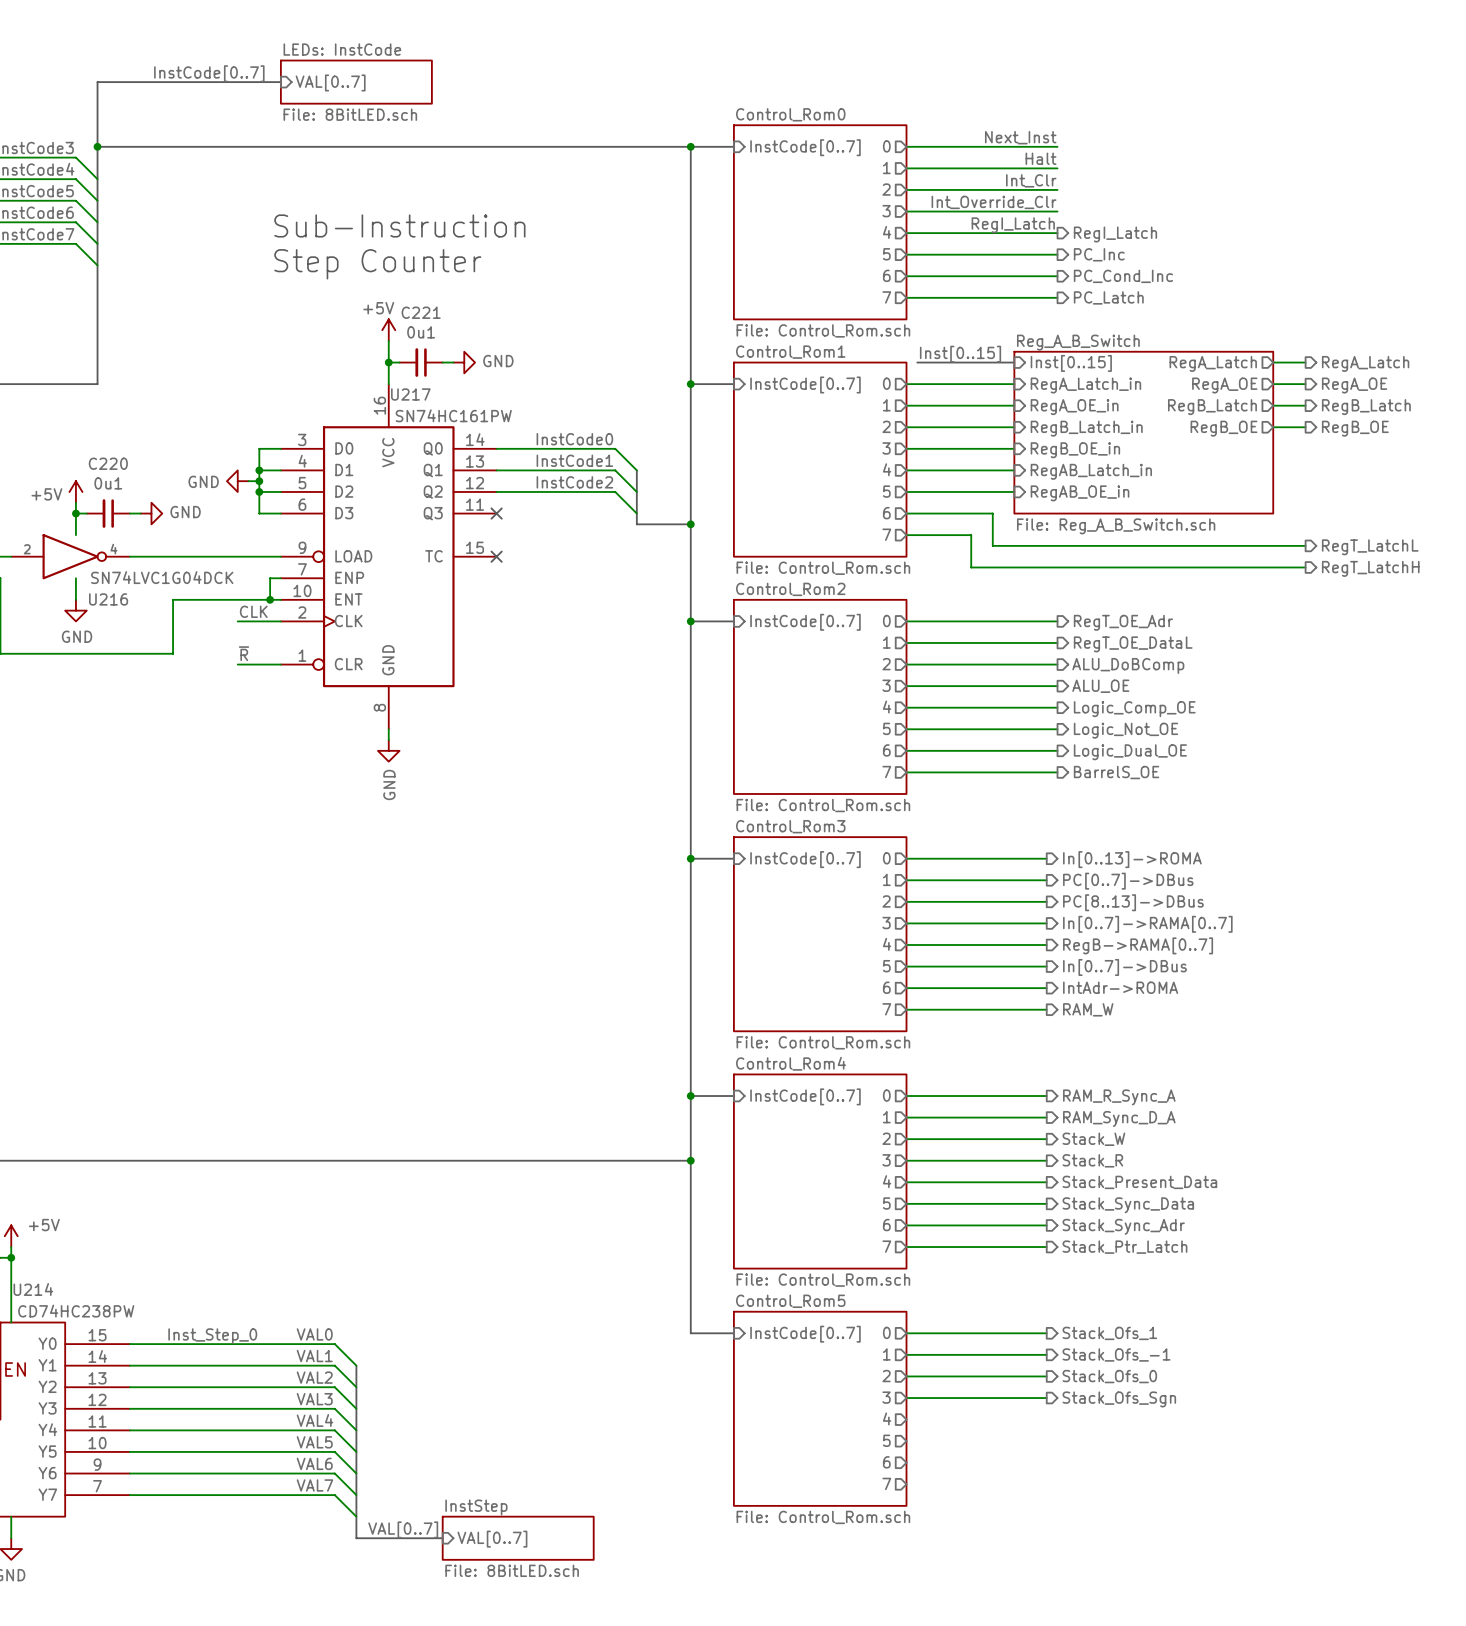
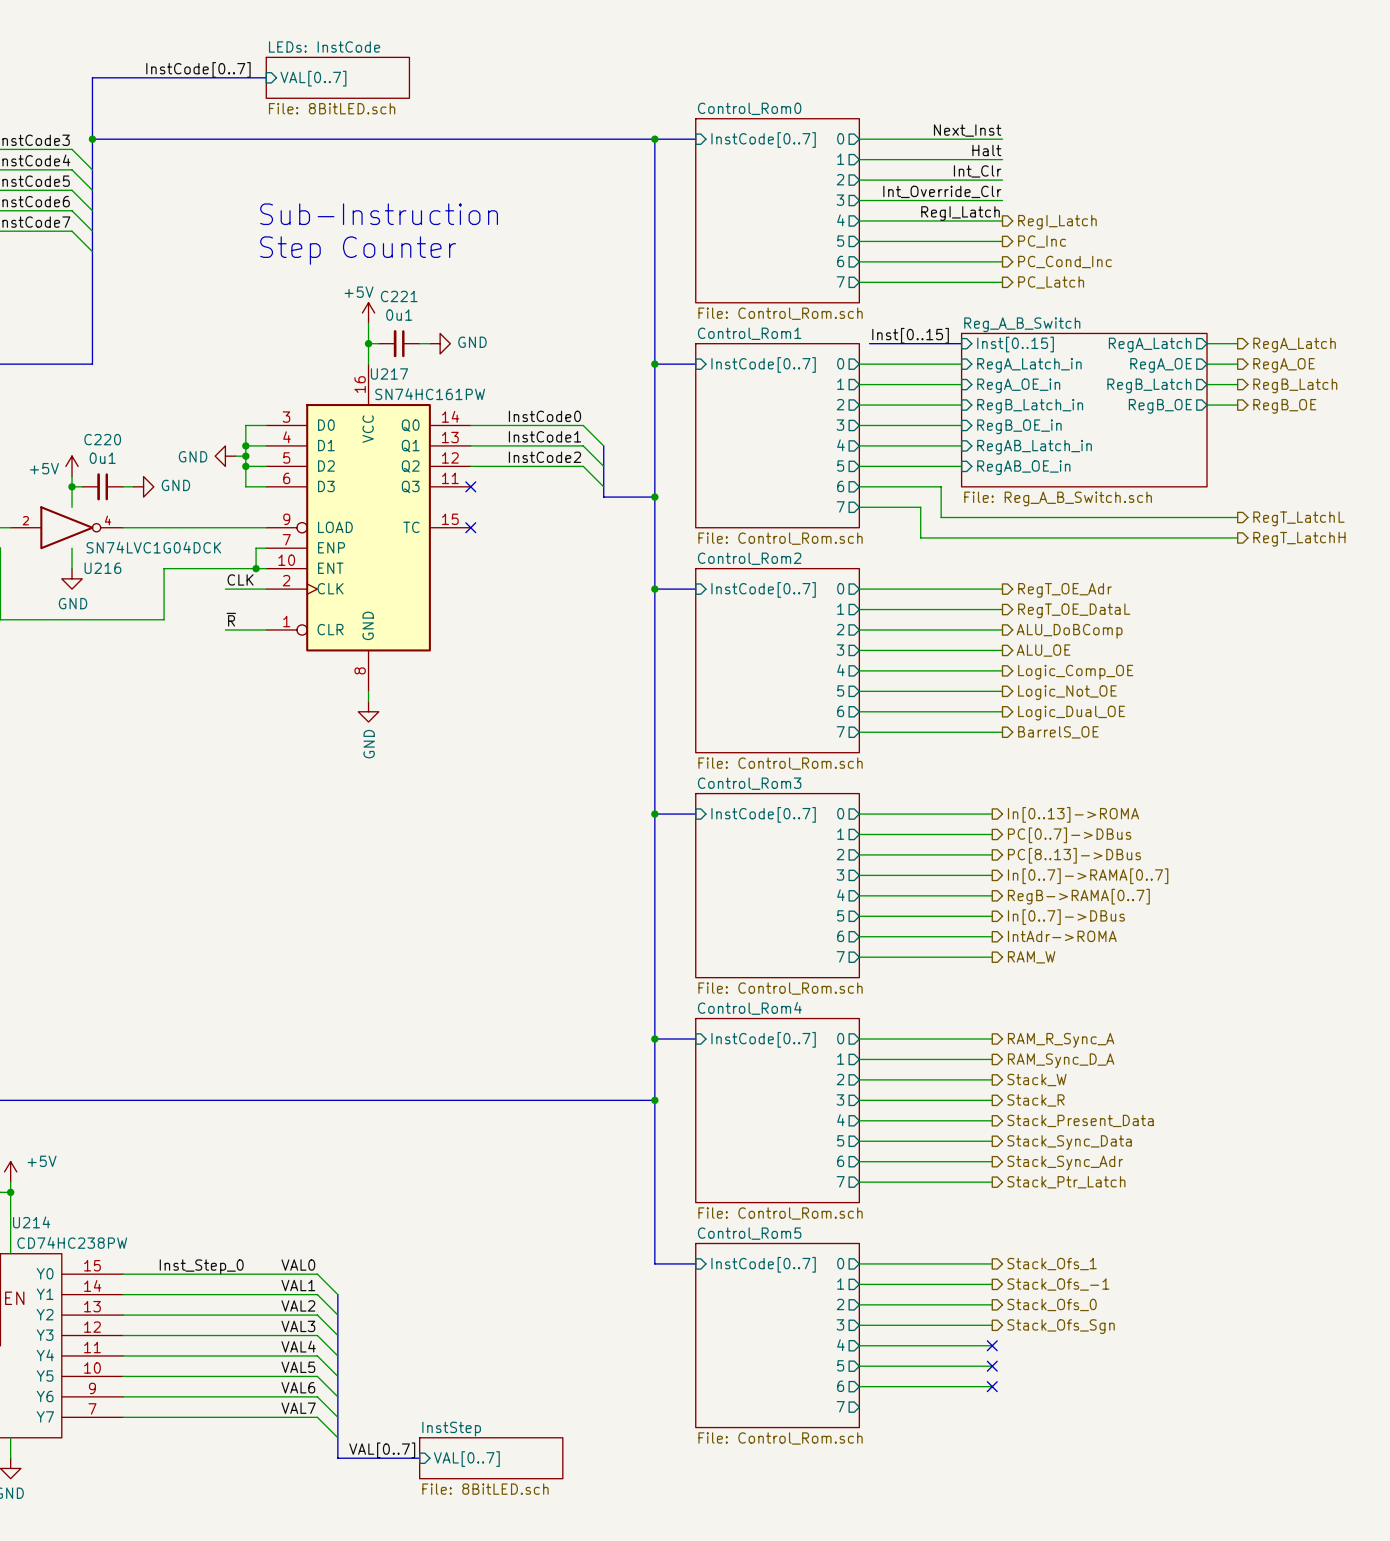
wire: none -> (859, 1345) (992, 1345)
no-connect mark: none -> (992, 1345)
wire: none -> (859, 1366) (992, 1366)
no-connect mark: none -> (992, 1366)
wire: none -> (859, 1386) (992, 1386)
no-connect mark: none -> (992, 1386)

